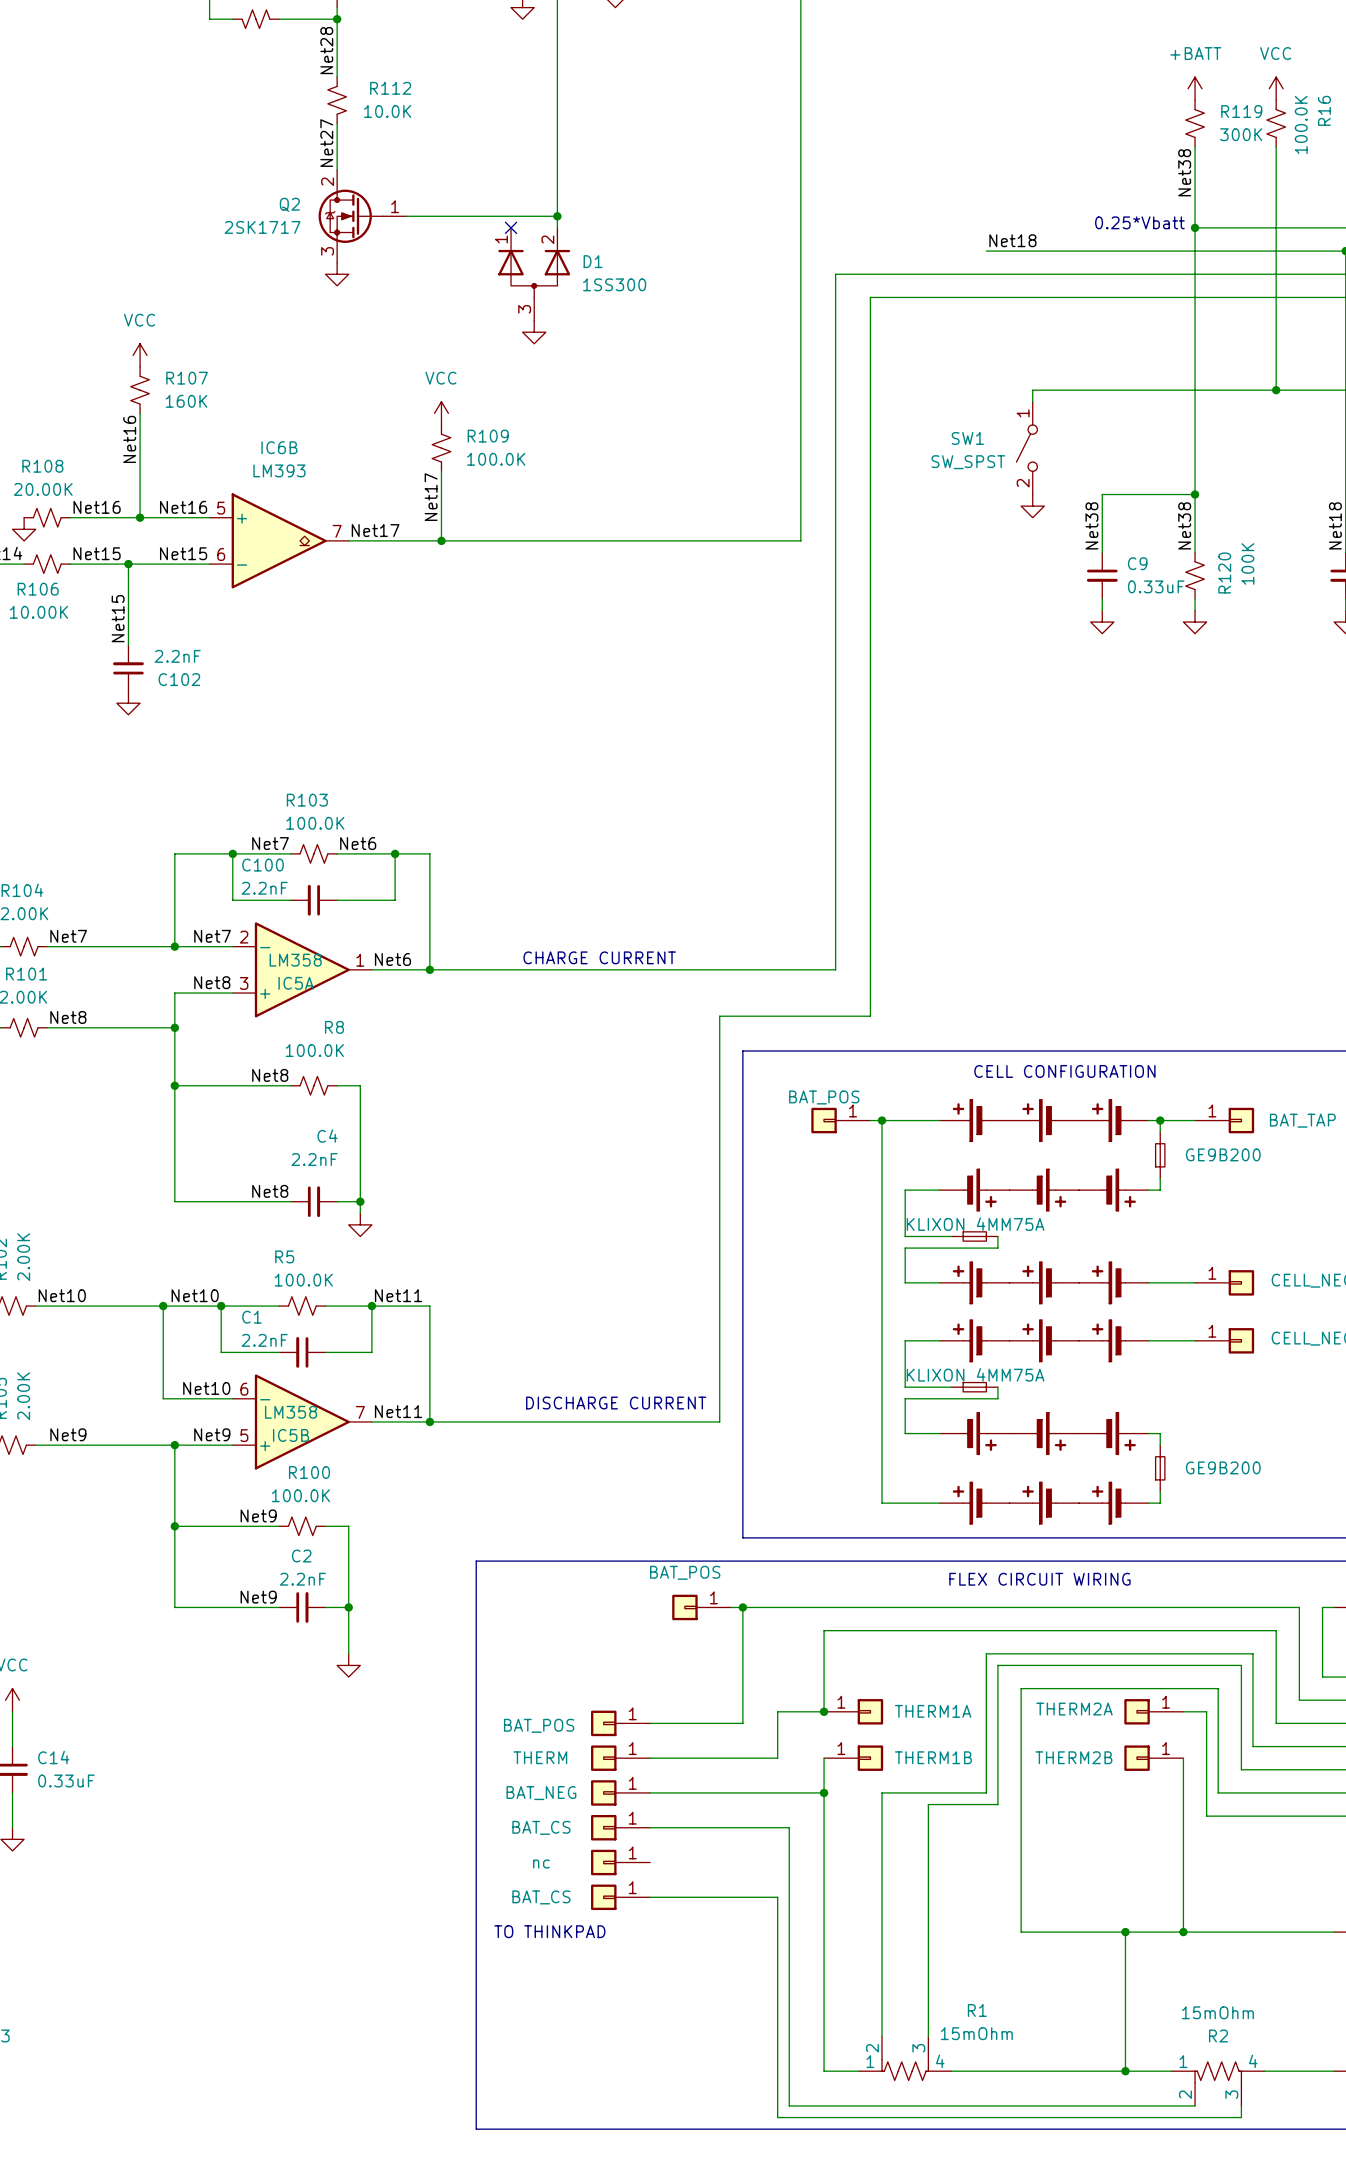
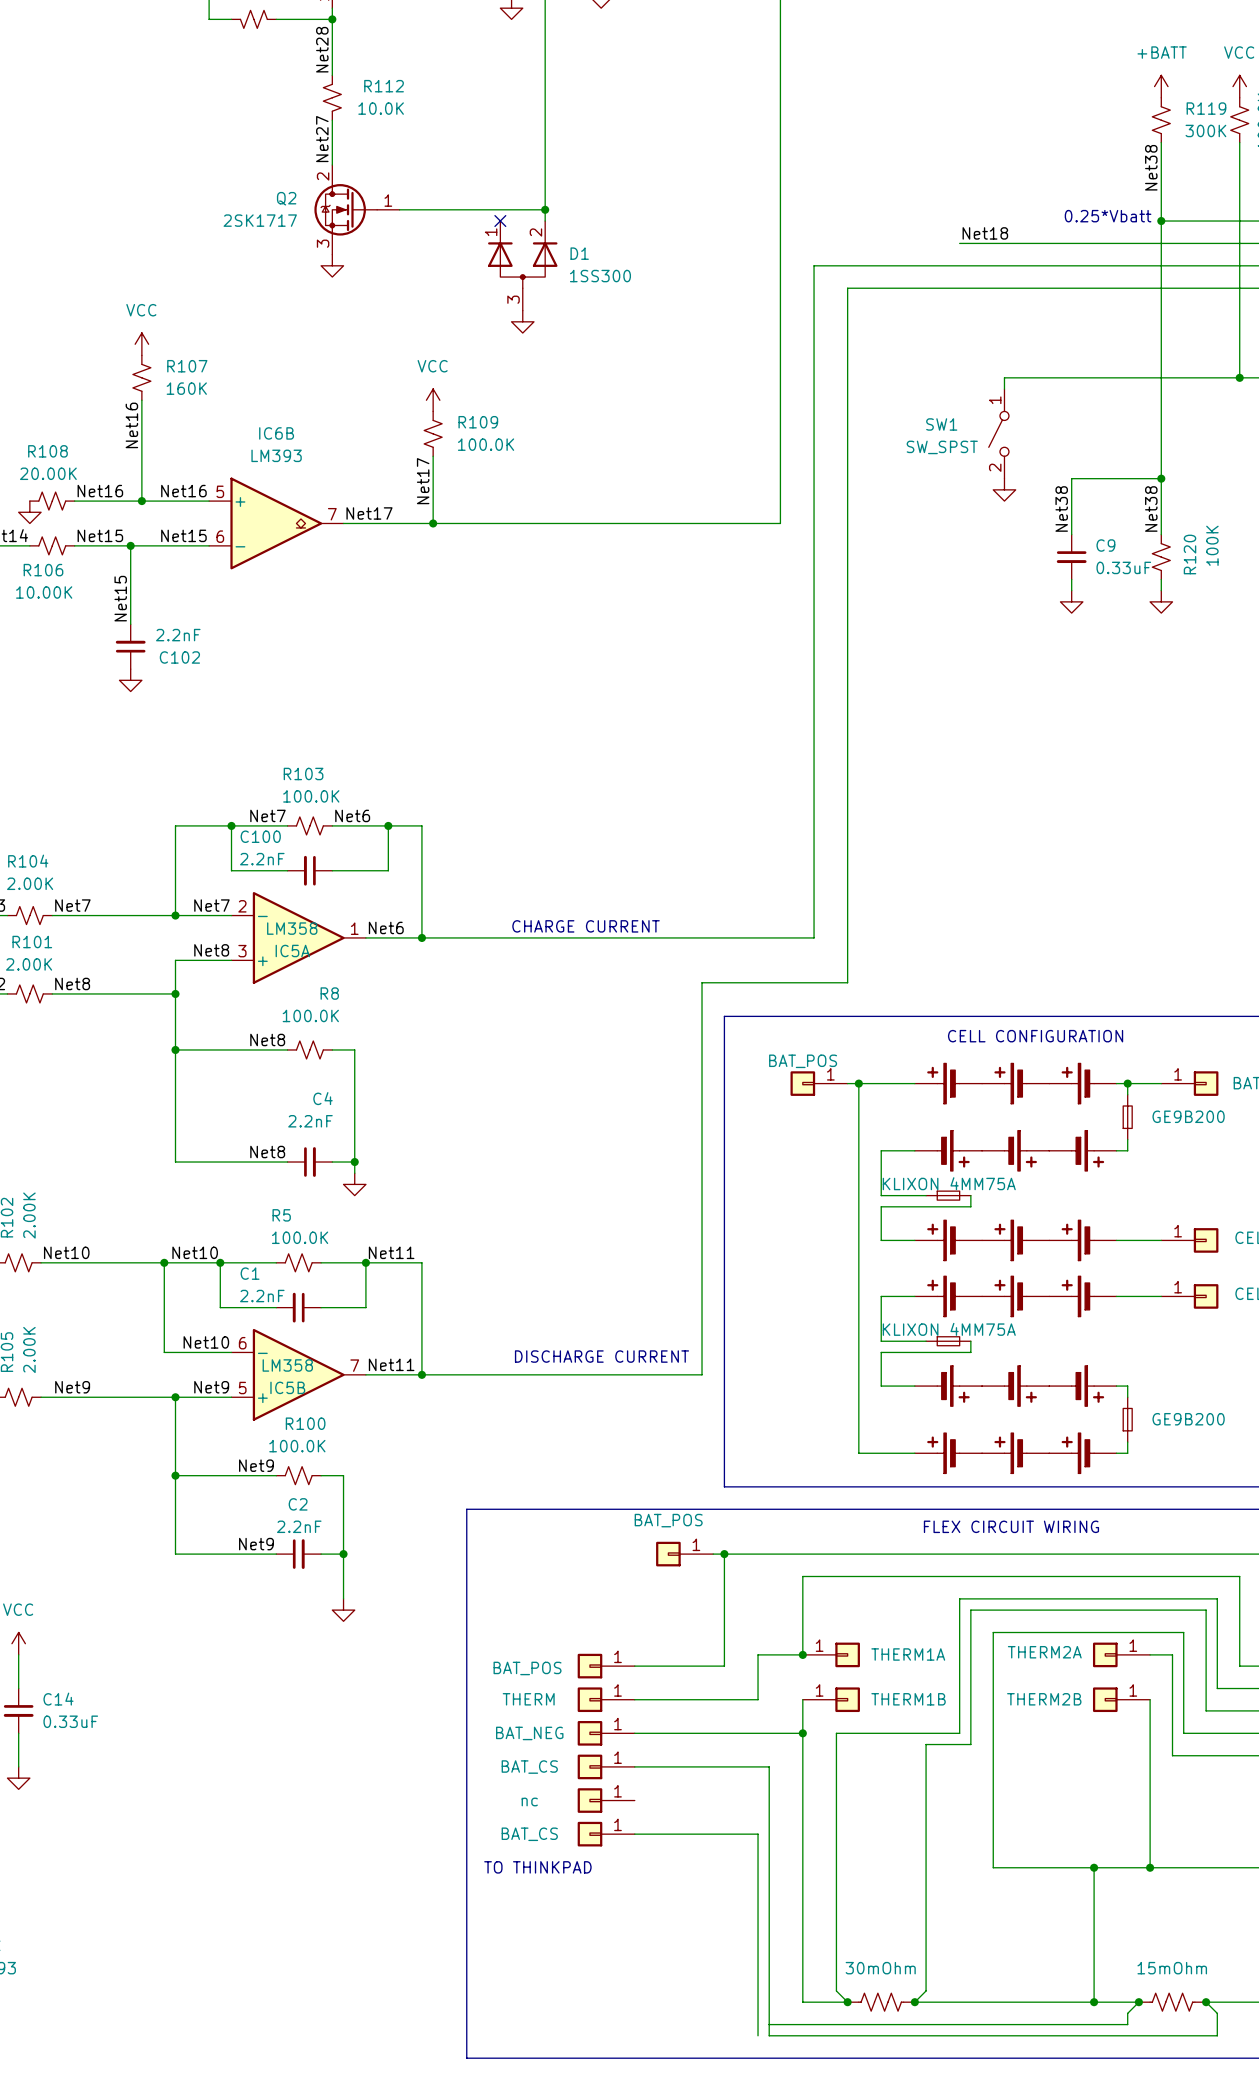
wire: (882, 1792) (882, 2036) -> (858, 1733) (836, 1733) (836, 1990) (847, 2002) (836, 2002)
wire: (951, 1804) (928, 1804) (928, 2036) -> (926, 1744) (926, 1990) (914, 2002) (926, 2002)
R1: 15mOhm (905, 2058) -> none
junction: none -> (847, 2002)
part: none -> 30mOhm (881, 2002)
junction: none -> (914, 2002)
wire: none -> (1138, 2002) (1127, 2013) (1127, 2024) (769, 2024)
junction: none -> (1138, 2002)
part: none -> 15mOhm (1172, 2002)
junction: none -> (1206, 2002)
wire: none -> (1228, 2002) (1206, 2002) (1217, 2013) (1217, 2035) (1161, 2035)
R2: 15mOhm (1218, 2083) -> none
wire: (777, 2105) (777, 2117) (1241, 2117) (1241, 2105) -> none

